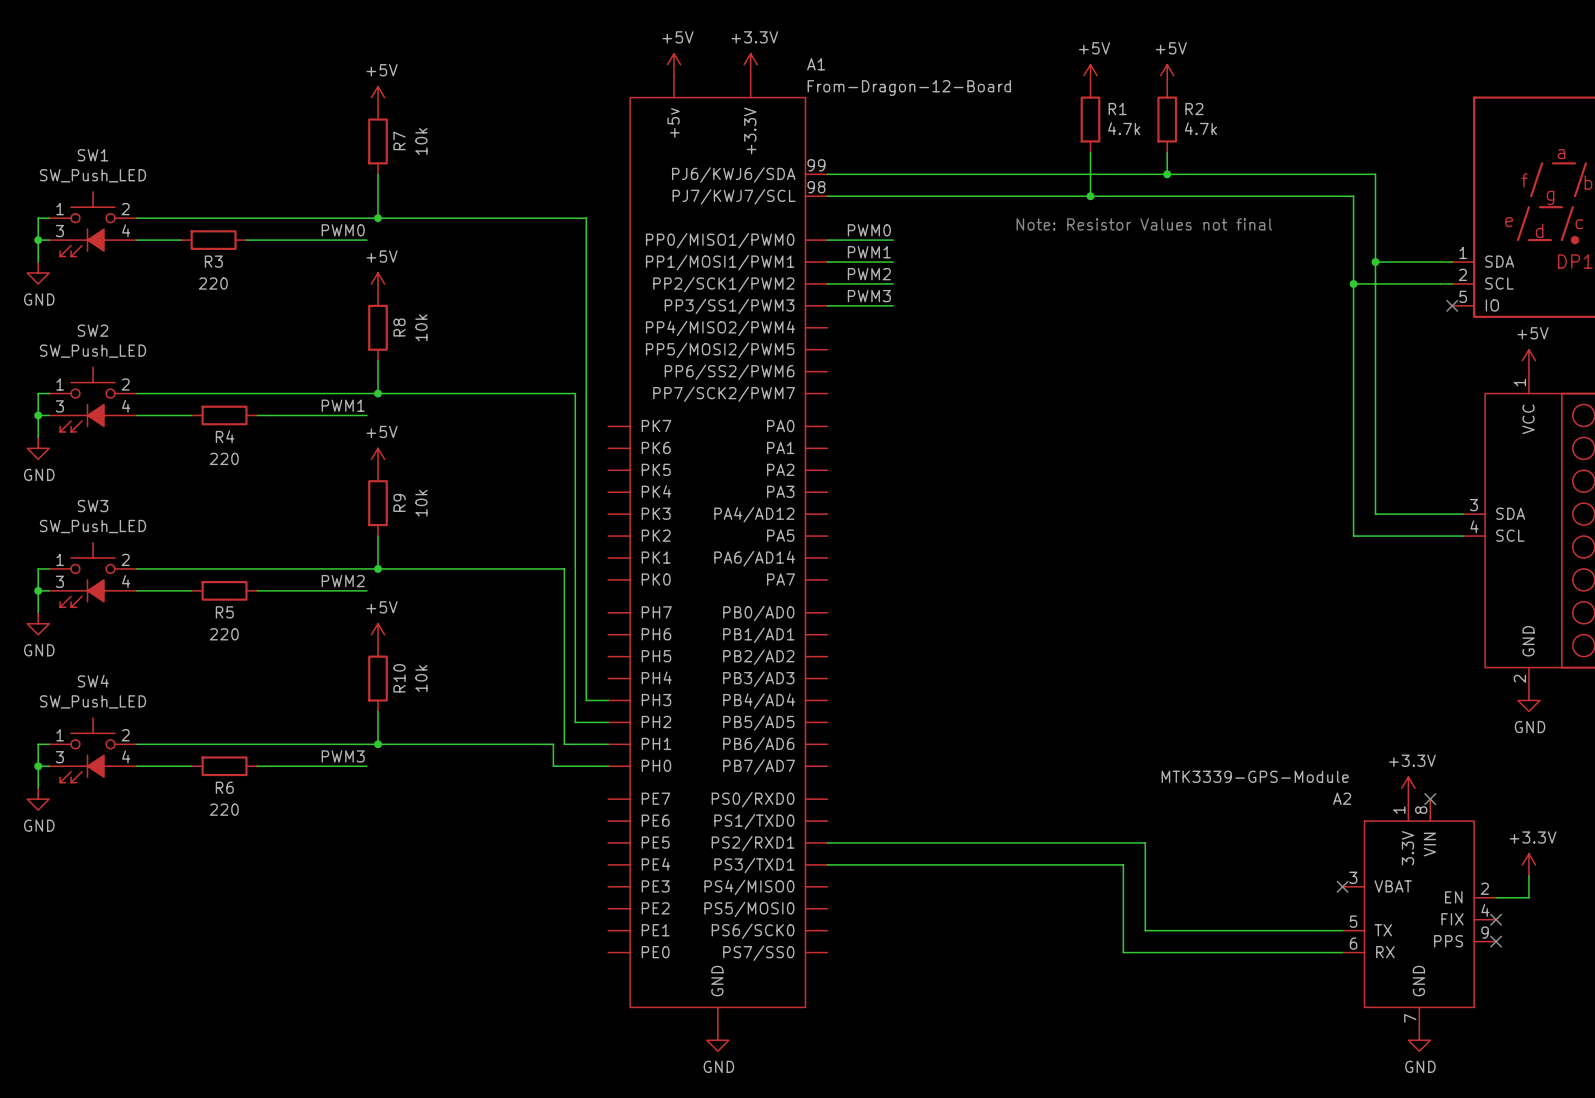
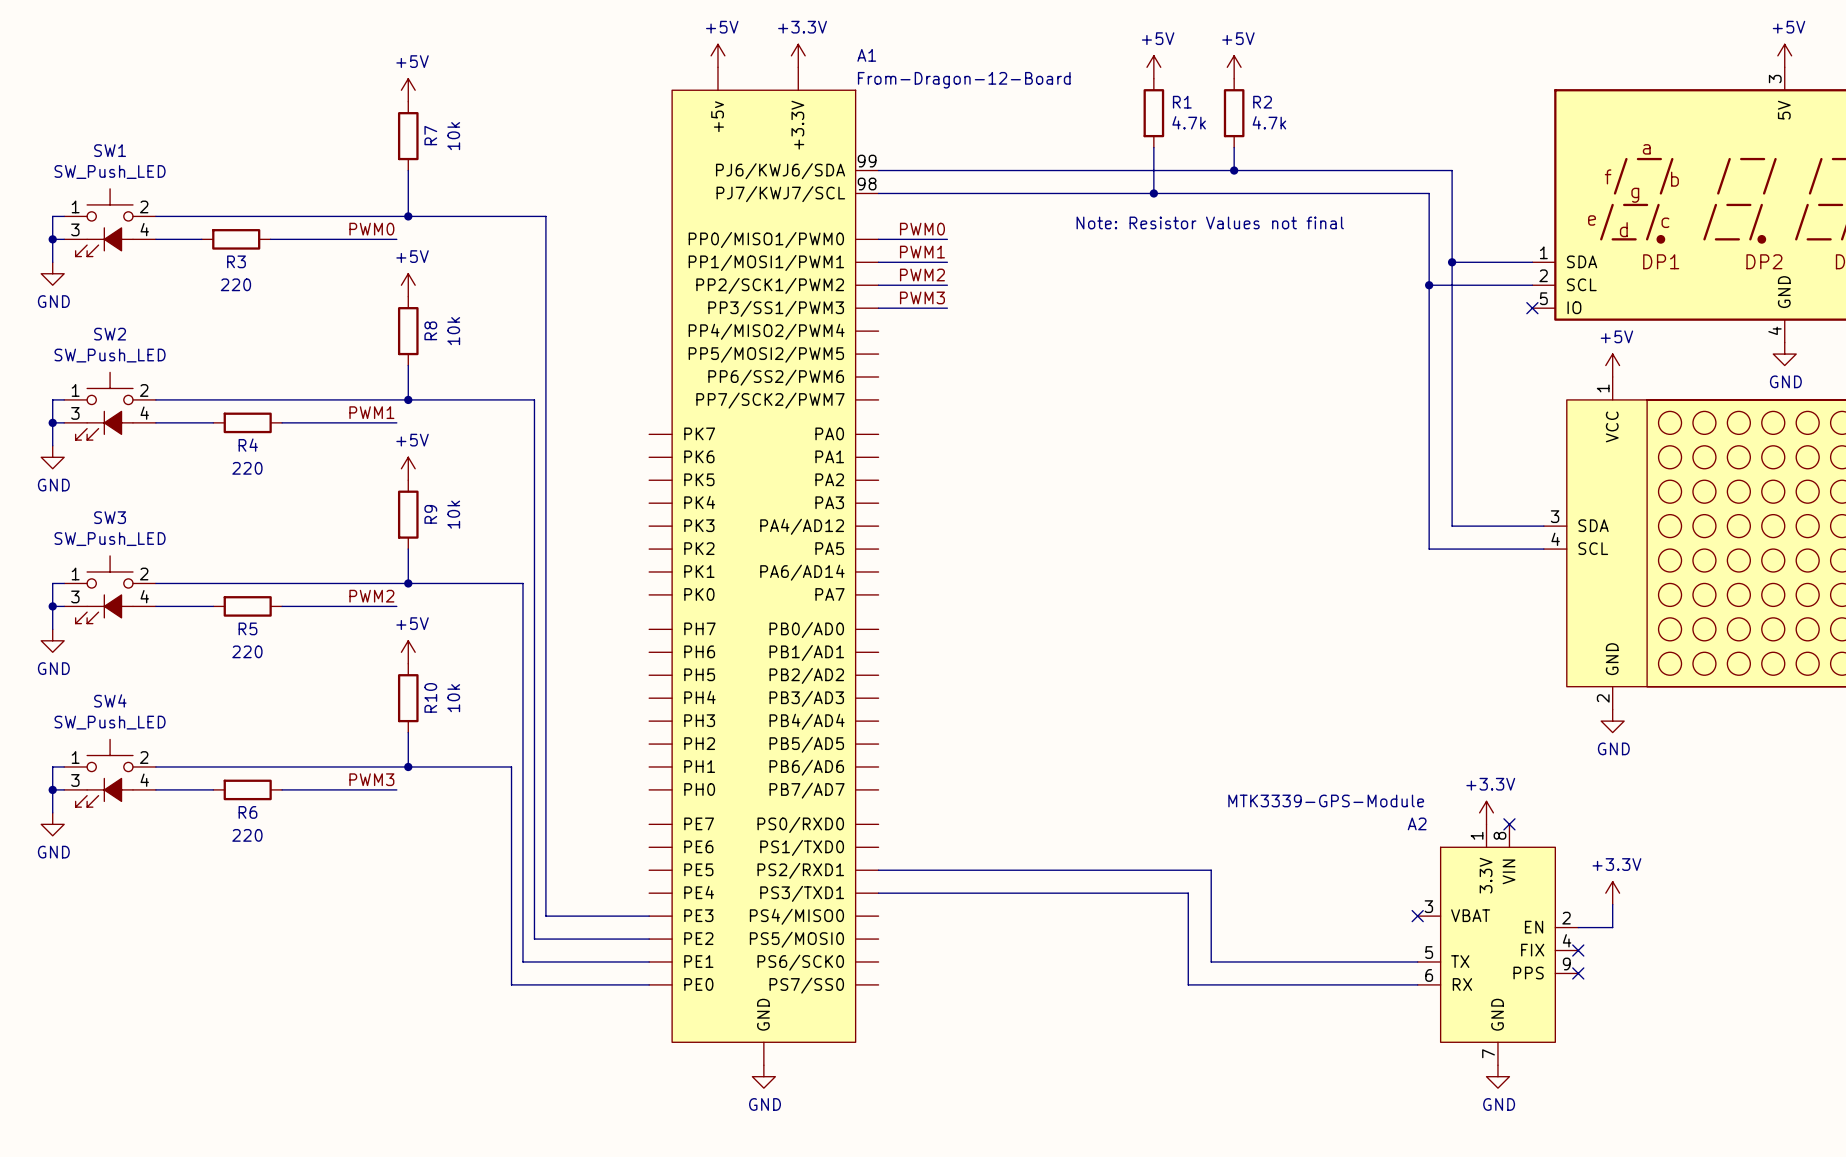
wire: (509, 218) (586, 218) (586, 700) (608, 700) -> (545, 216) (545, 916) (649, 916)
wire: (498, 393) (575, 393) (575, 722) (608, 722) -> (534, 399) (534, 939) (649, 939)
wire: (487, 568) (564, 568) (564, 744) (608, 744) -> (522, 583) (522, 961) (649, 961)
wire: (476, 744) (553, 744) (553, 766) (608, 766) -> (511, 766) (511, 984) (649, 984)

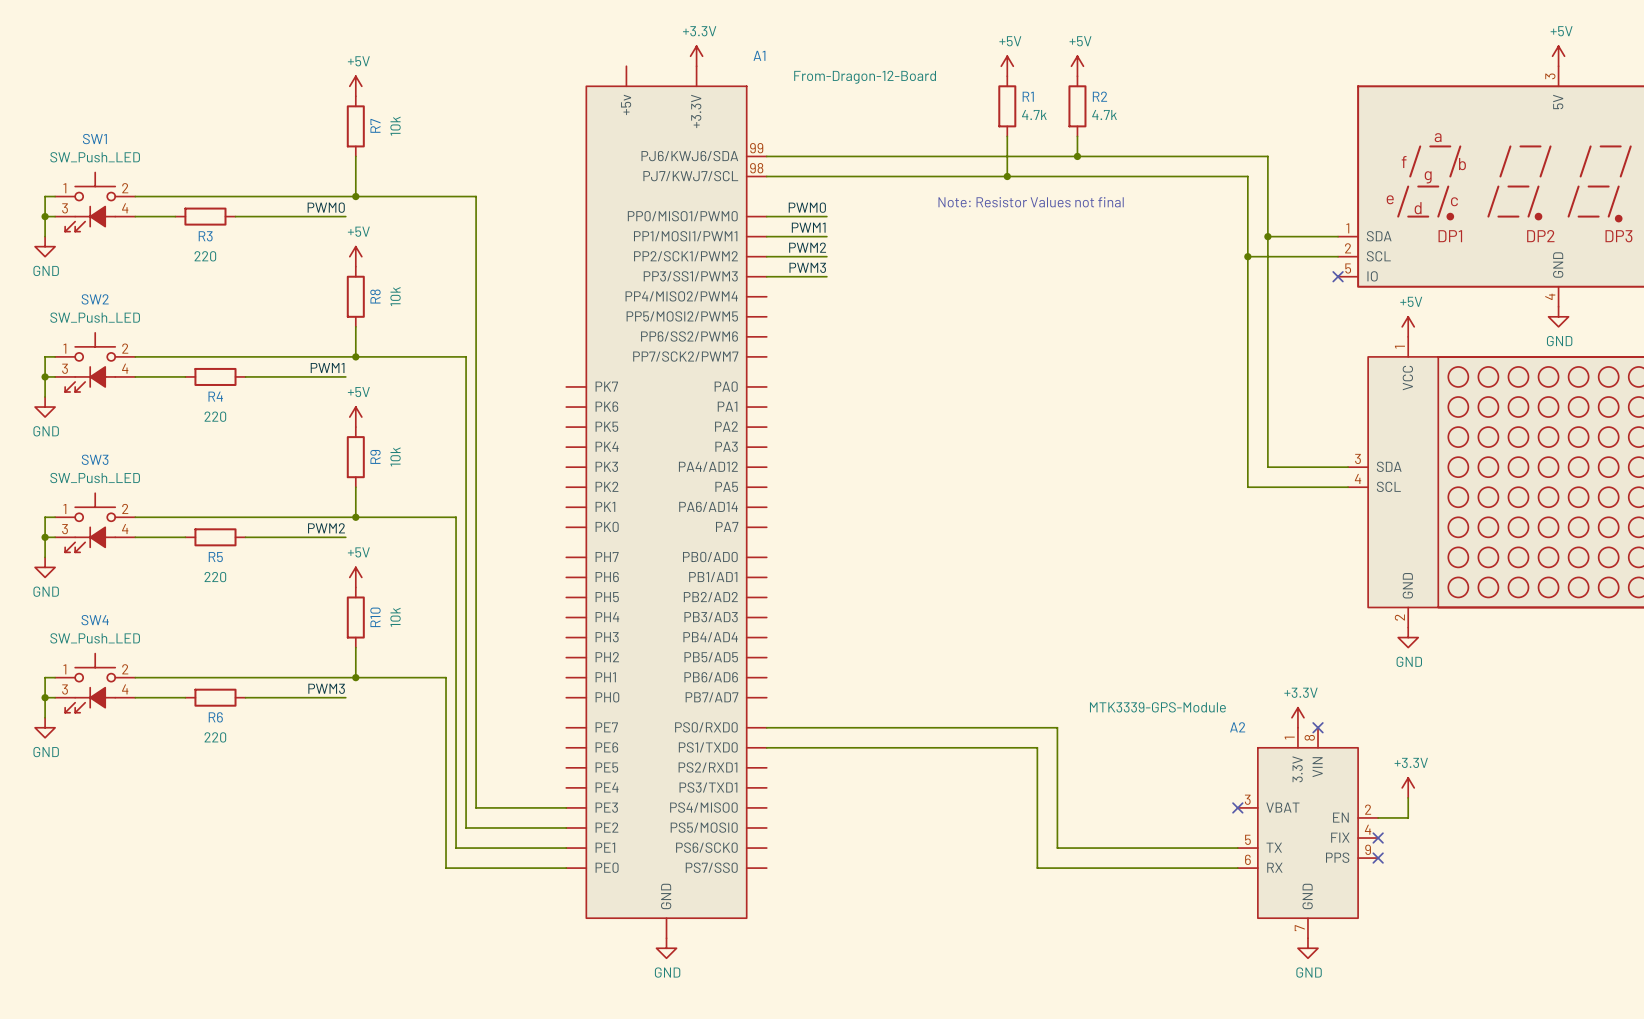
power symbol: +5V (717, 55) -> none
wire: (878, 870) (1211, 870) -> (766, 727) (1057, 727) (1057, 767)
wire: (878, 893) (1188, 893) -> (766, 747) (1037, 747) (1037, 787)

